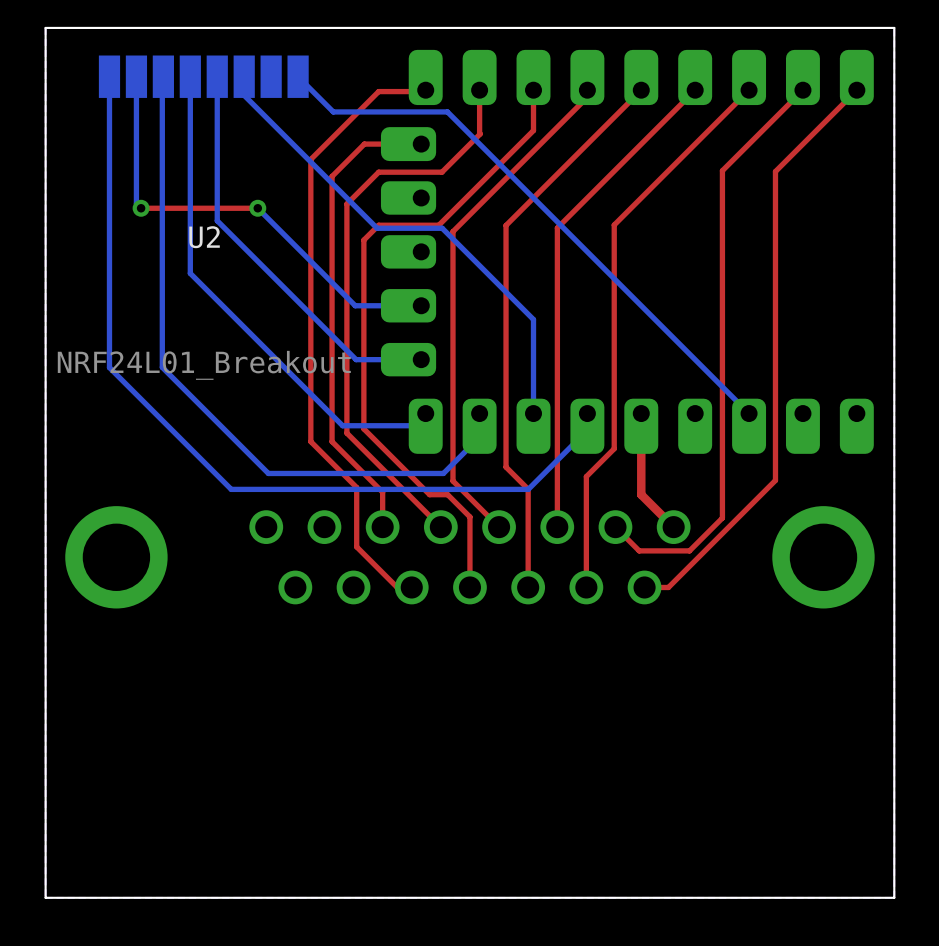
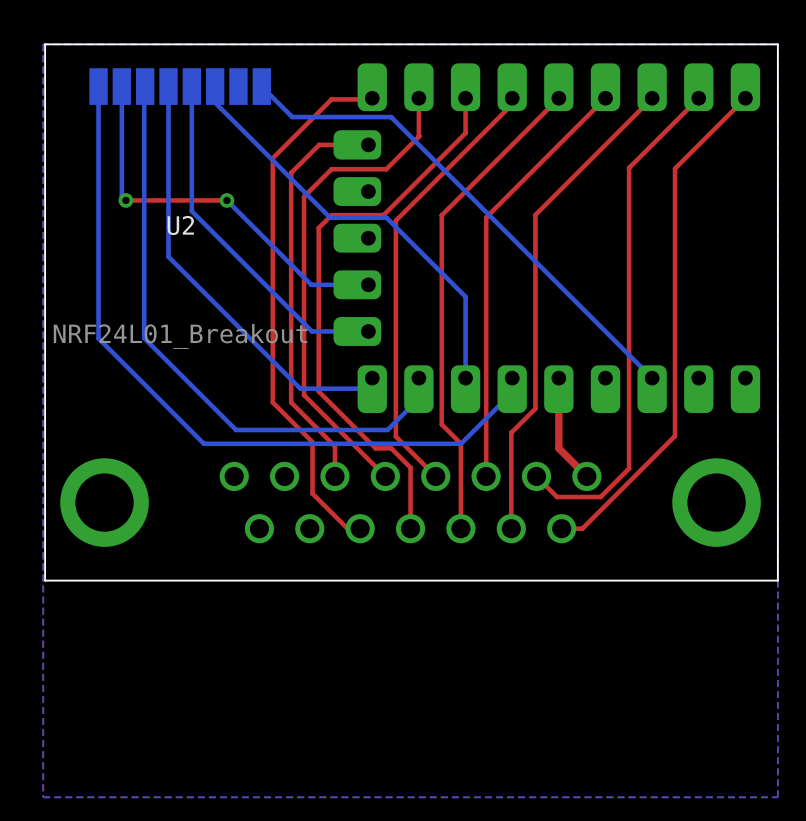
board edge: (47, 27) (45, 27) (45, 897) (894, 897) (894, 647) -> (45, 44) (45, 580) (777, 580)

